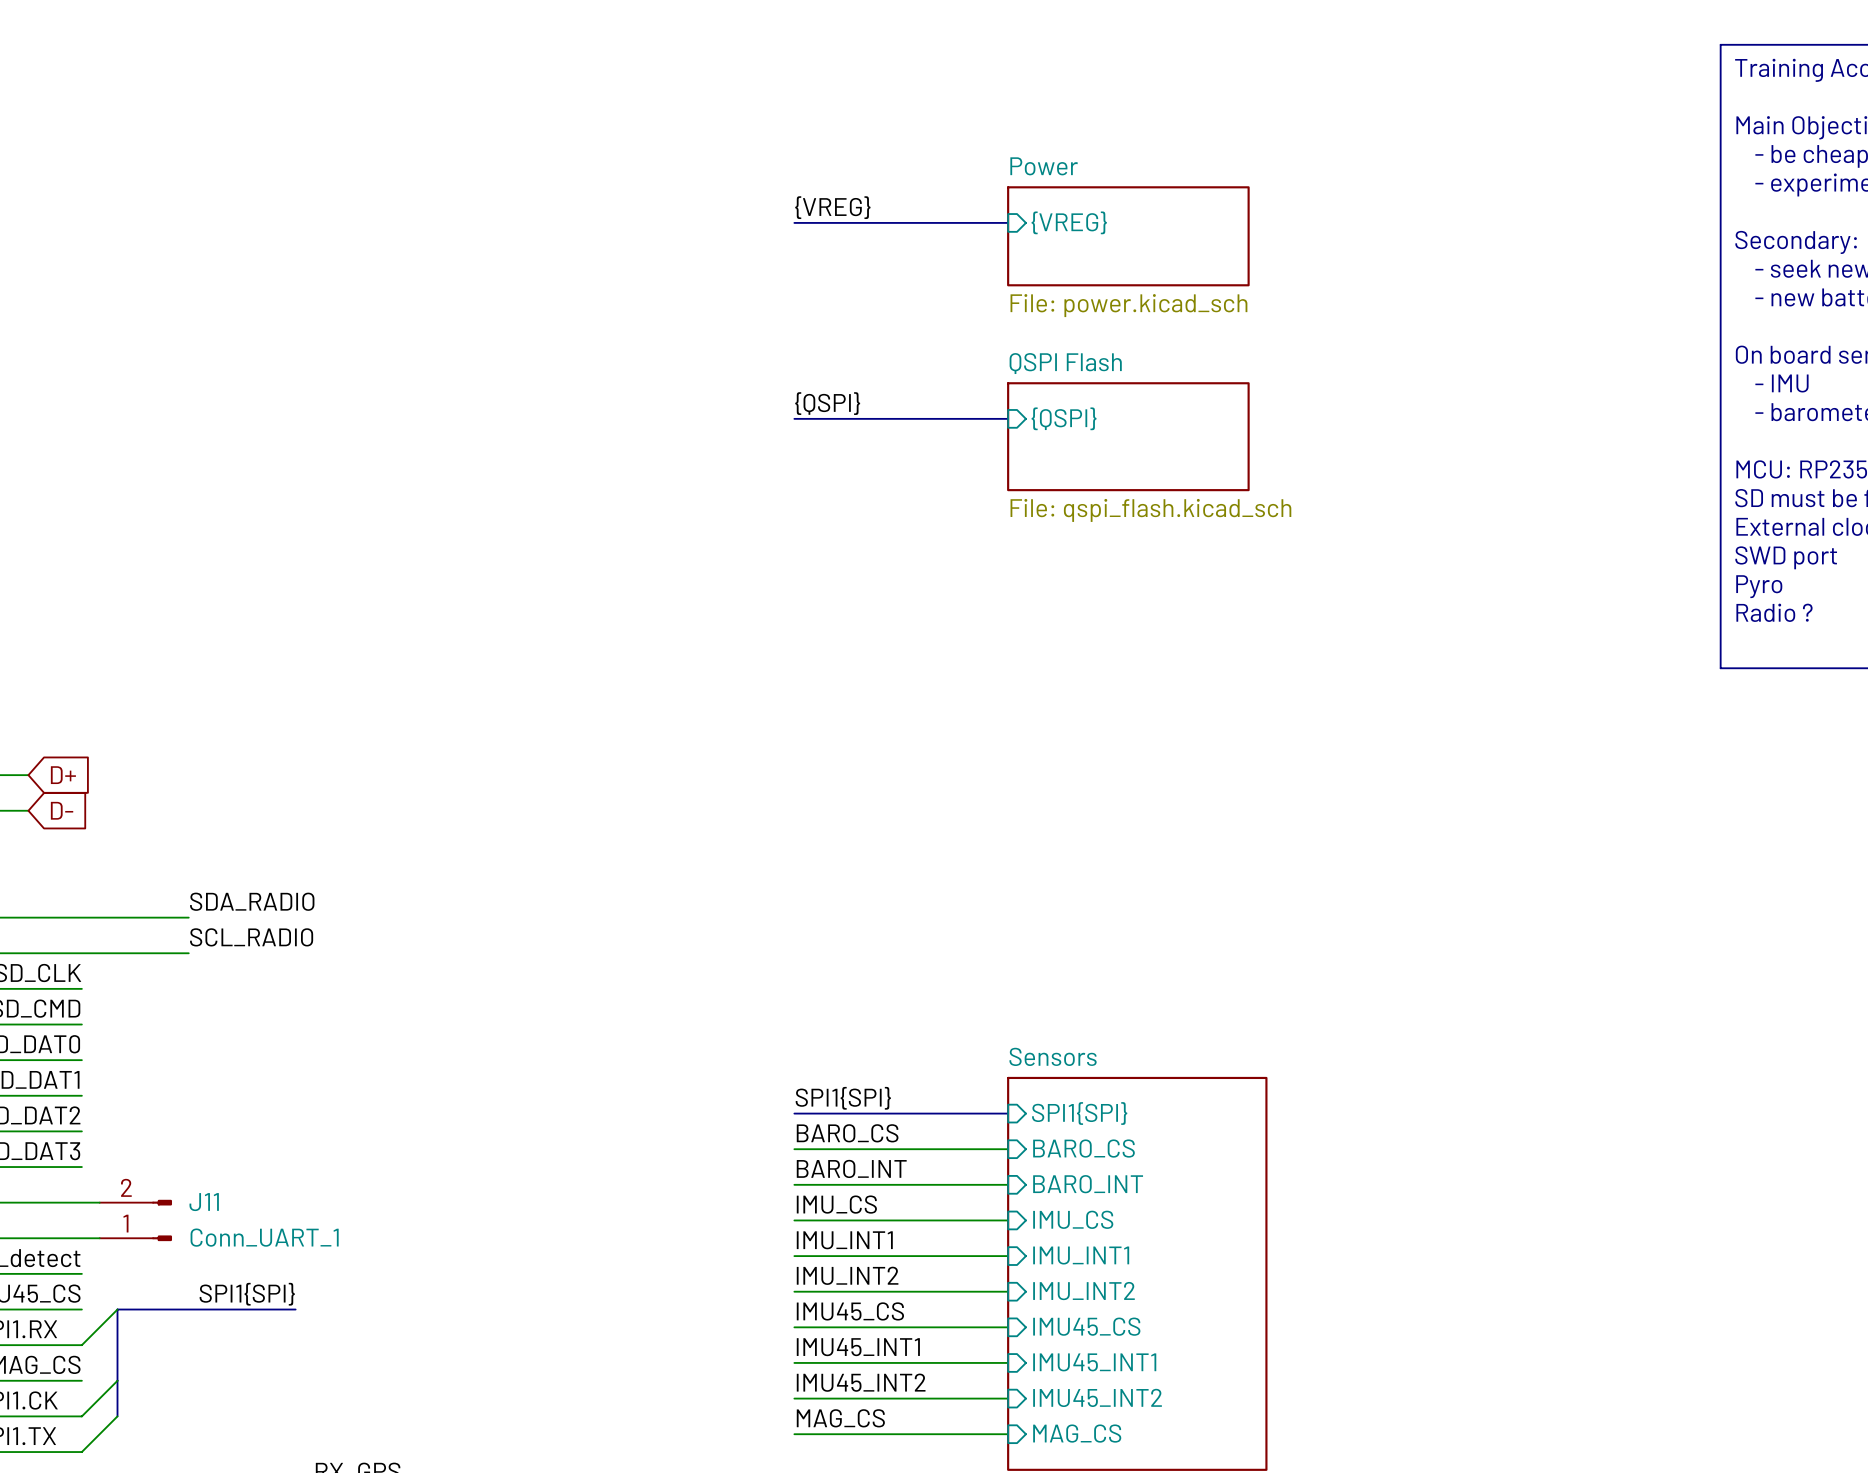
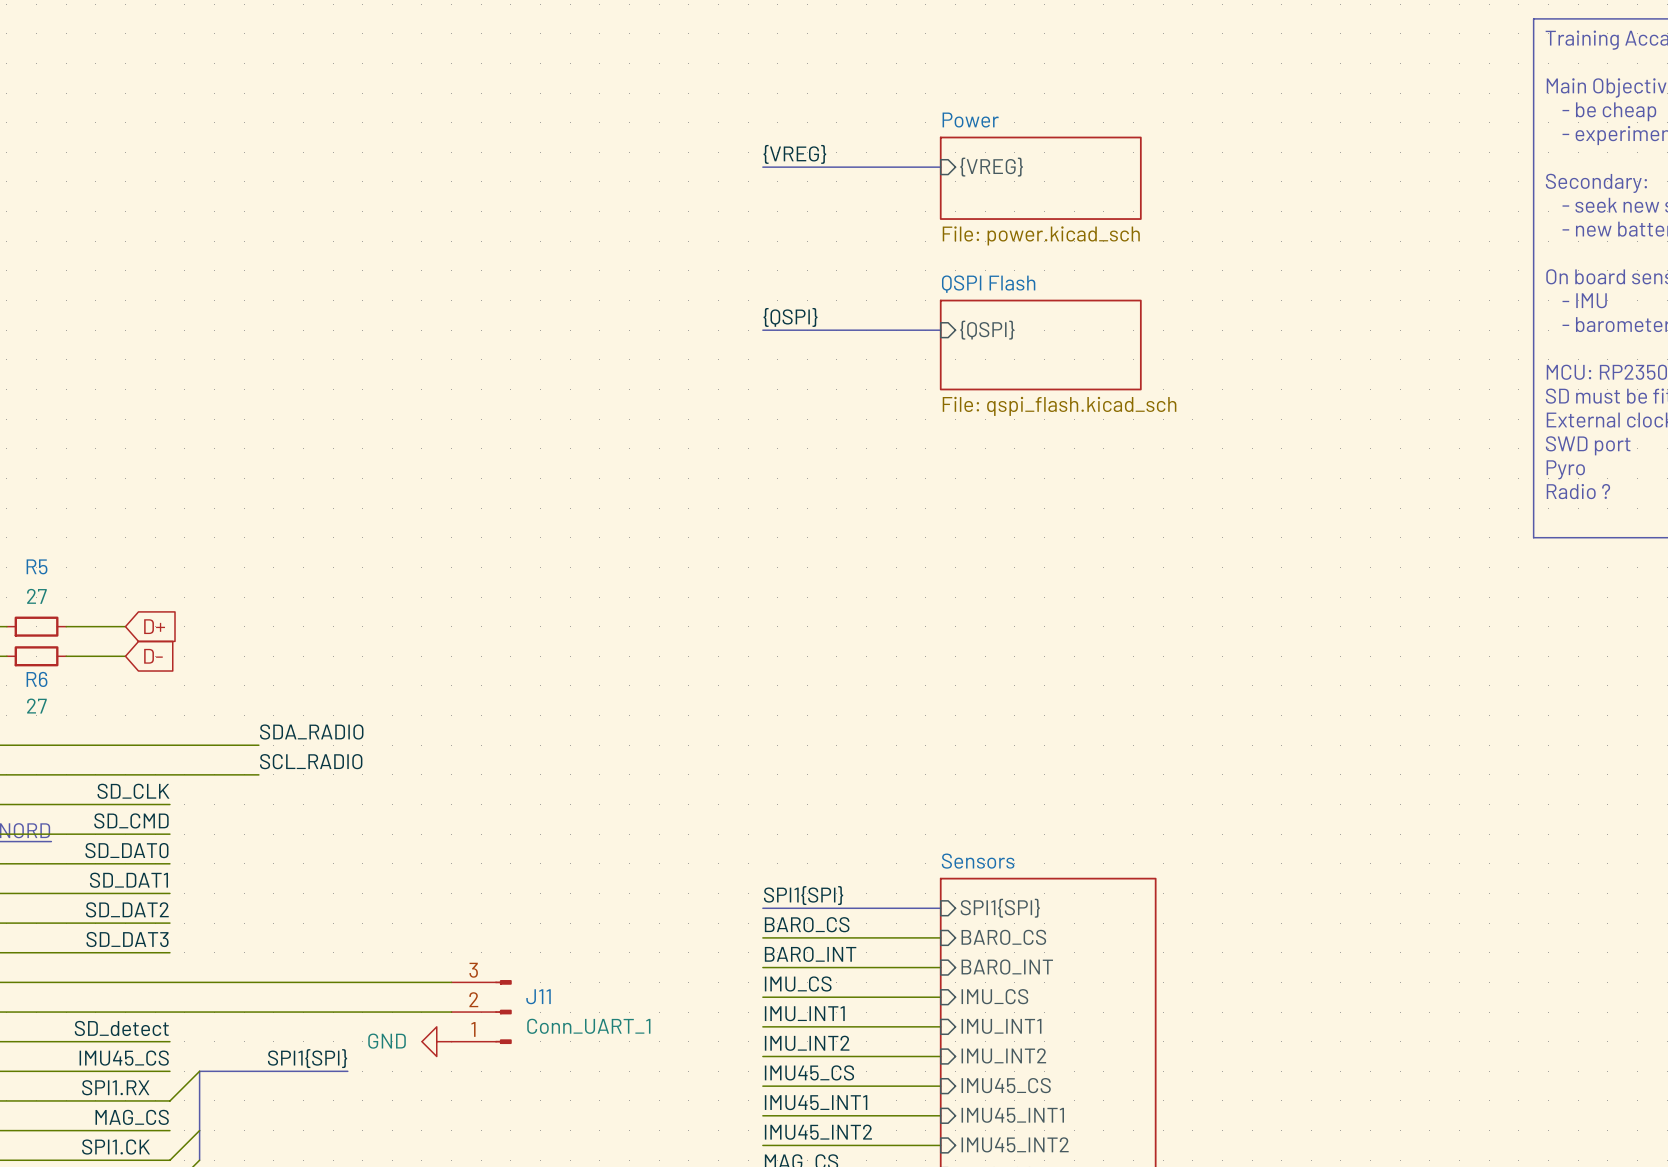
J11 symbol: [99, 1199, 173, 1242] -> [451, 980, 512, 1045]
wire: none -> (184, 982) (451, 982)
wire: none -> (184, 1012) (451, 1012)
power symbol: none -> GND (436, 1041)

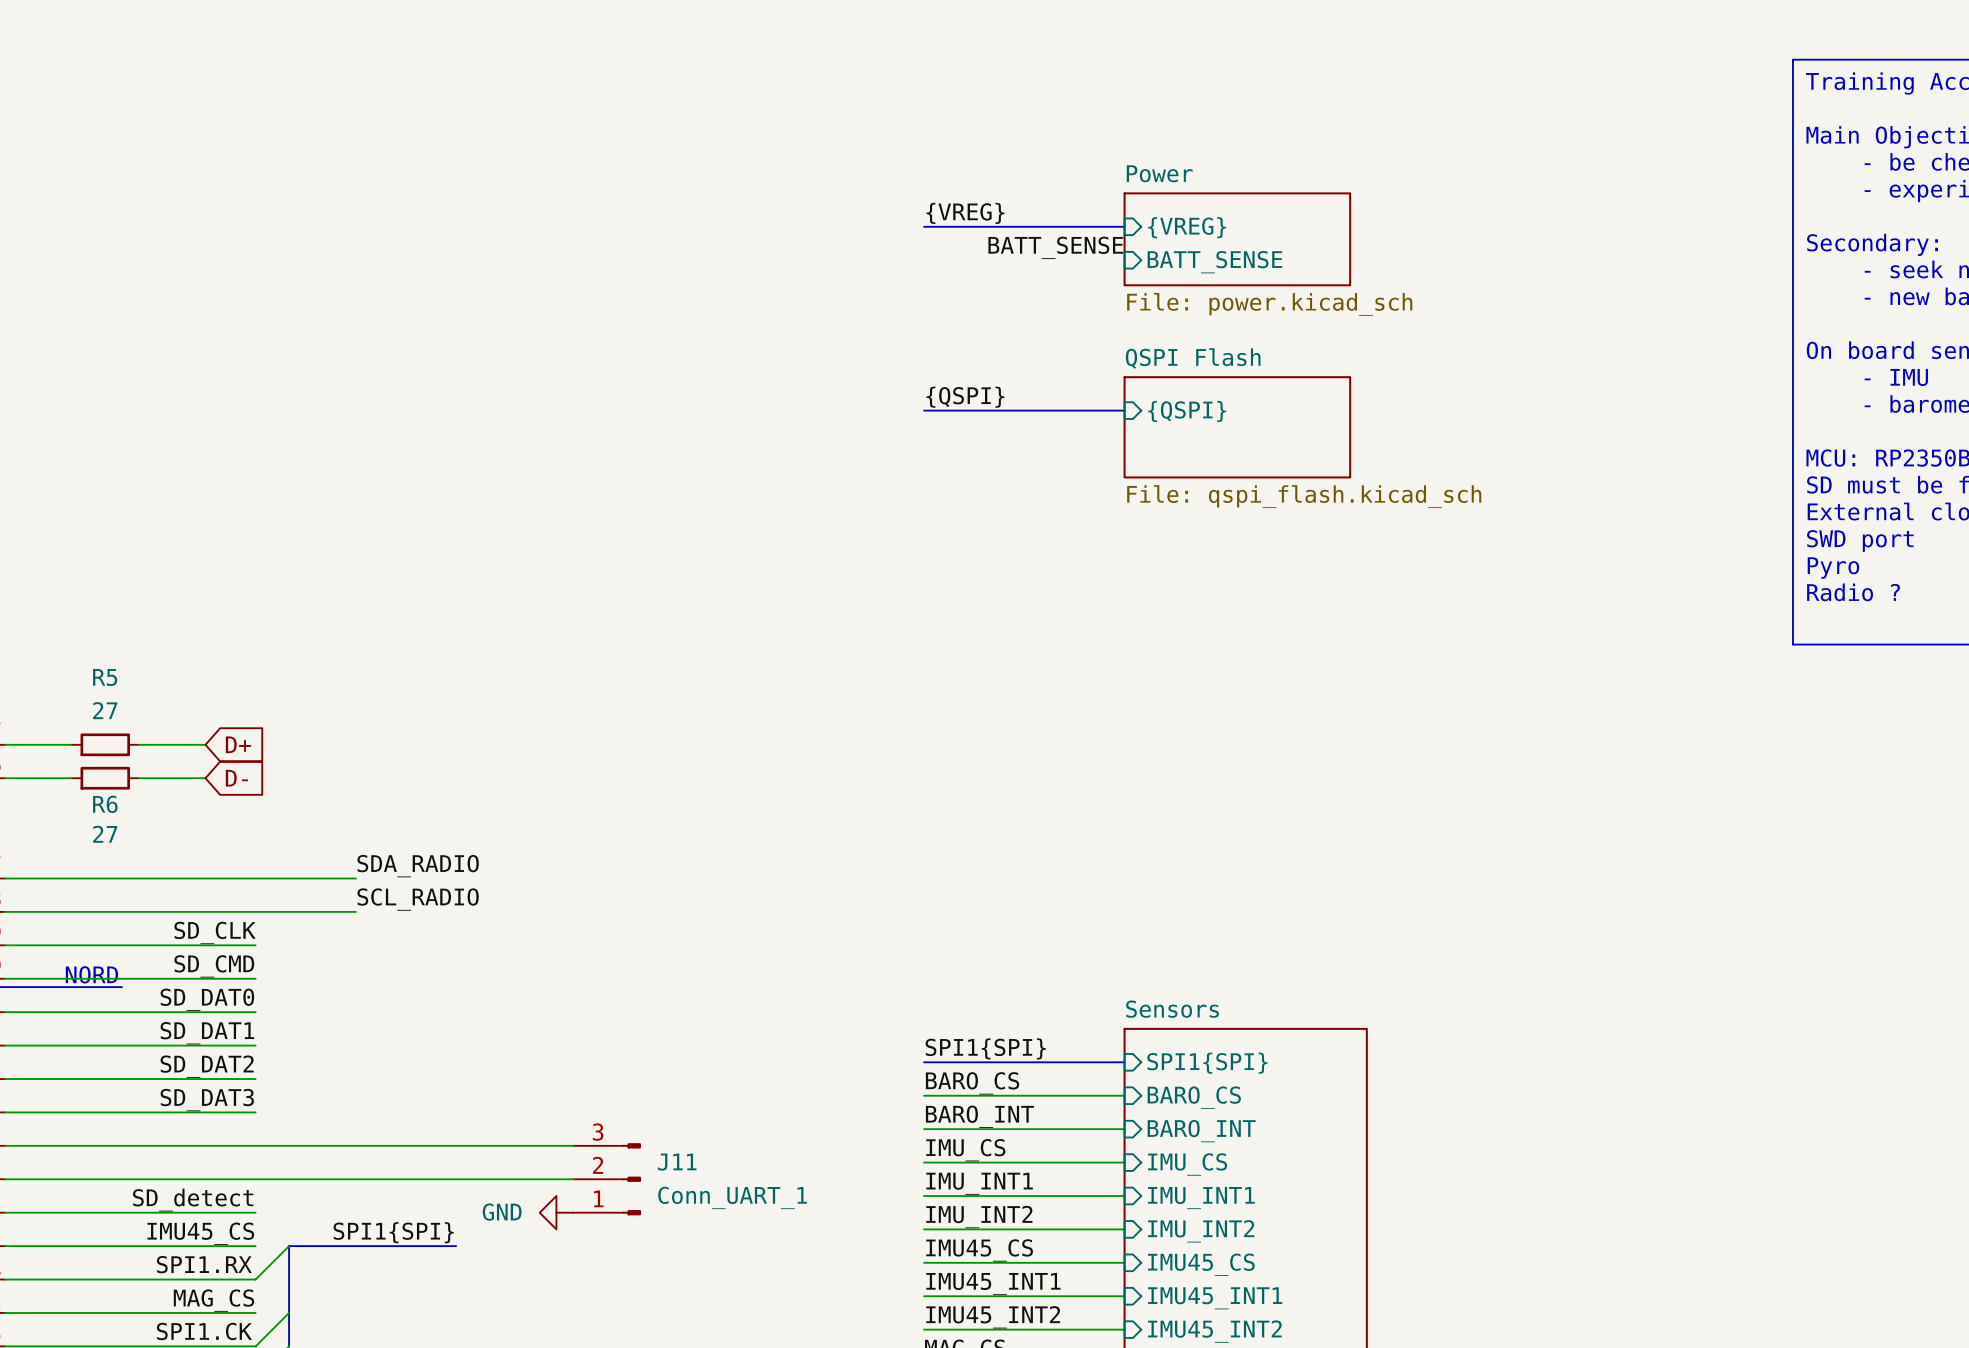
label: none -> BATT_SENSE (1055, 247)
sheet pin: none -> BATT_SENSE (1214, 262)

